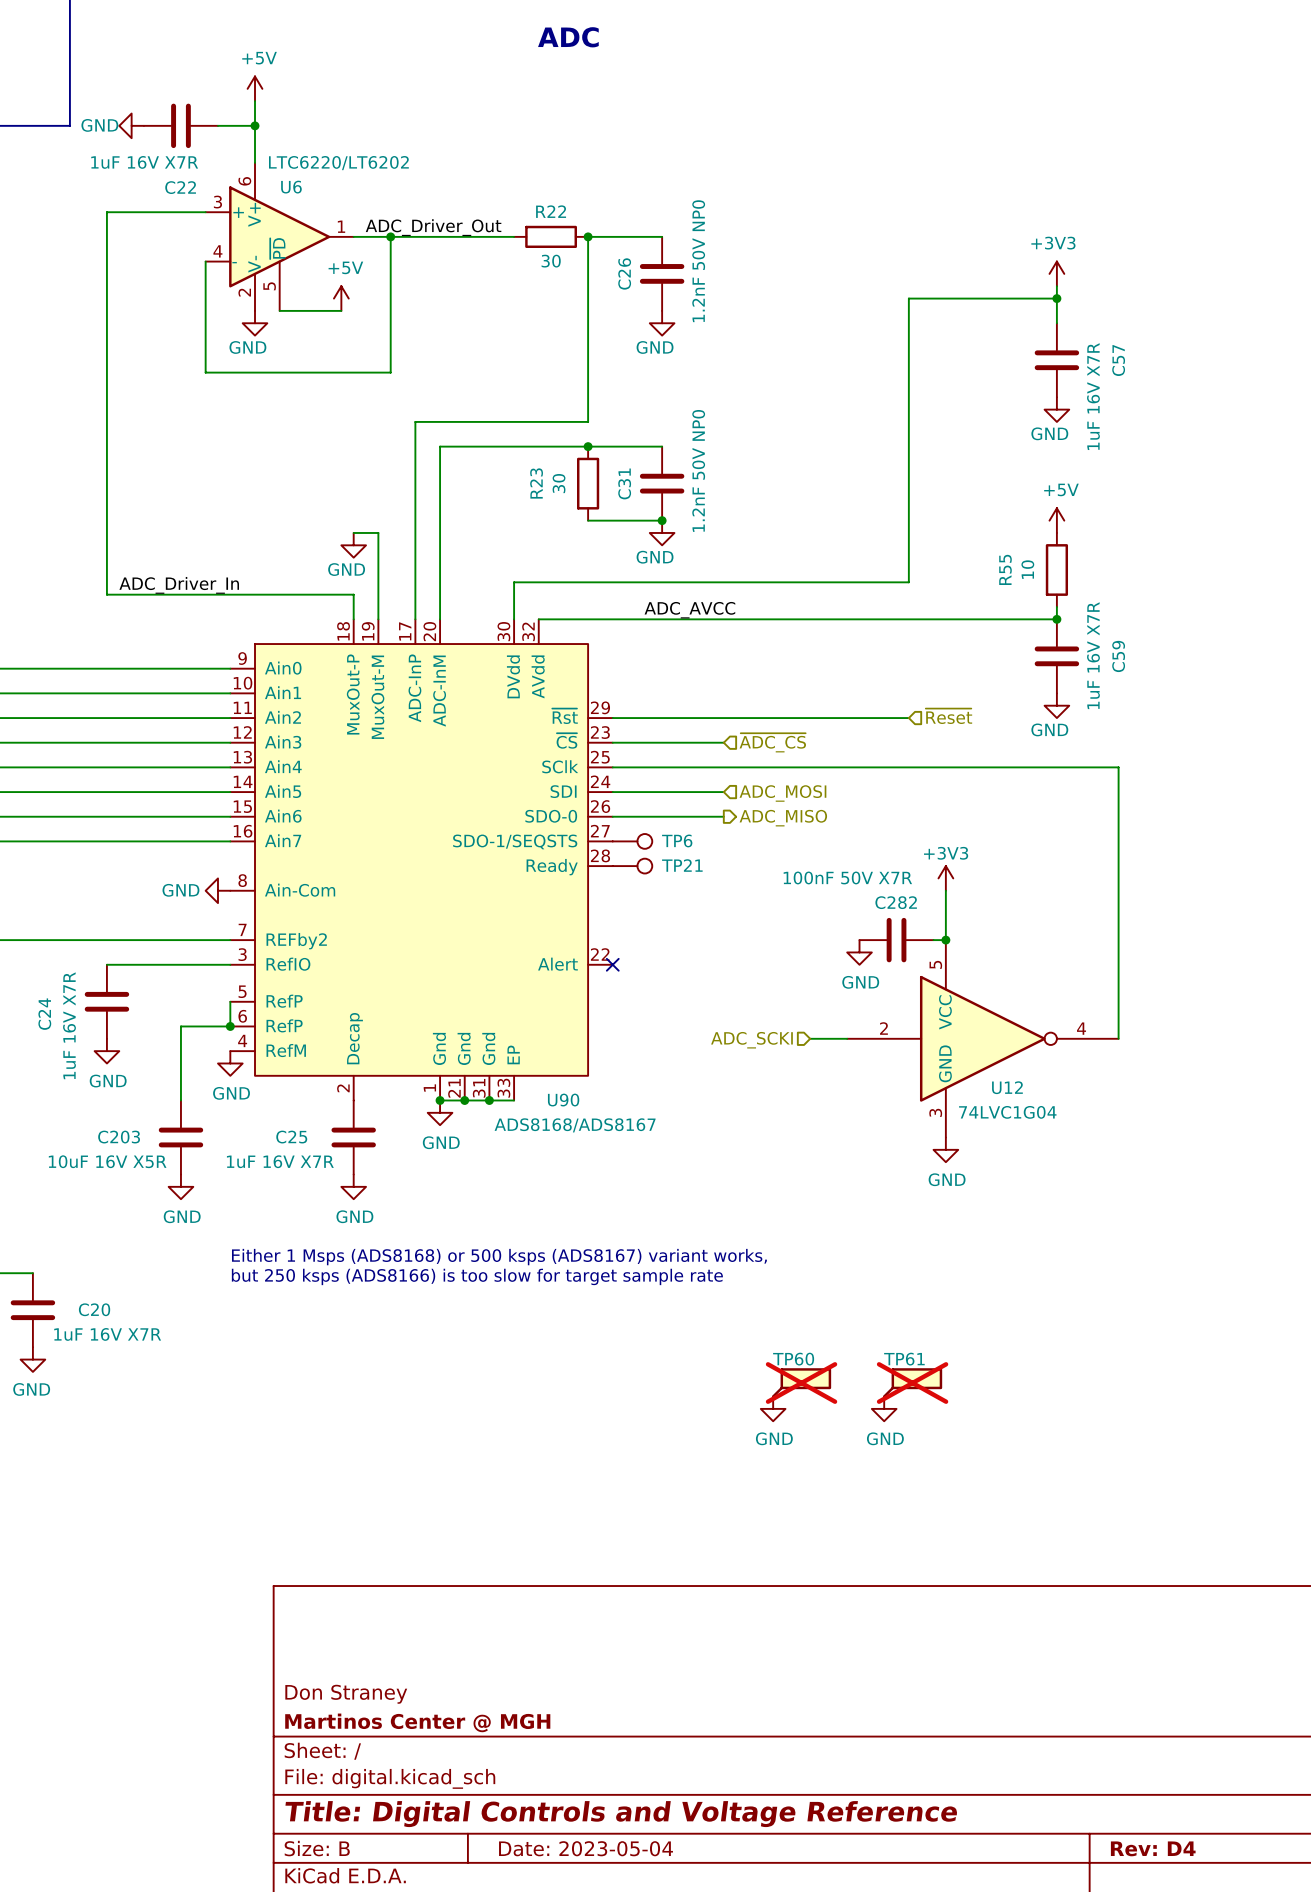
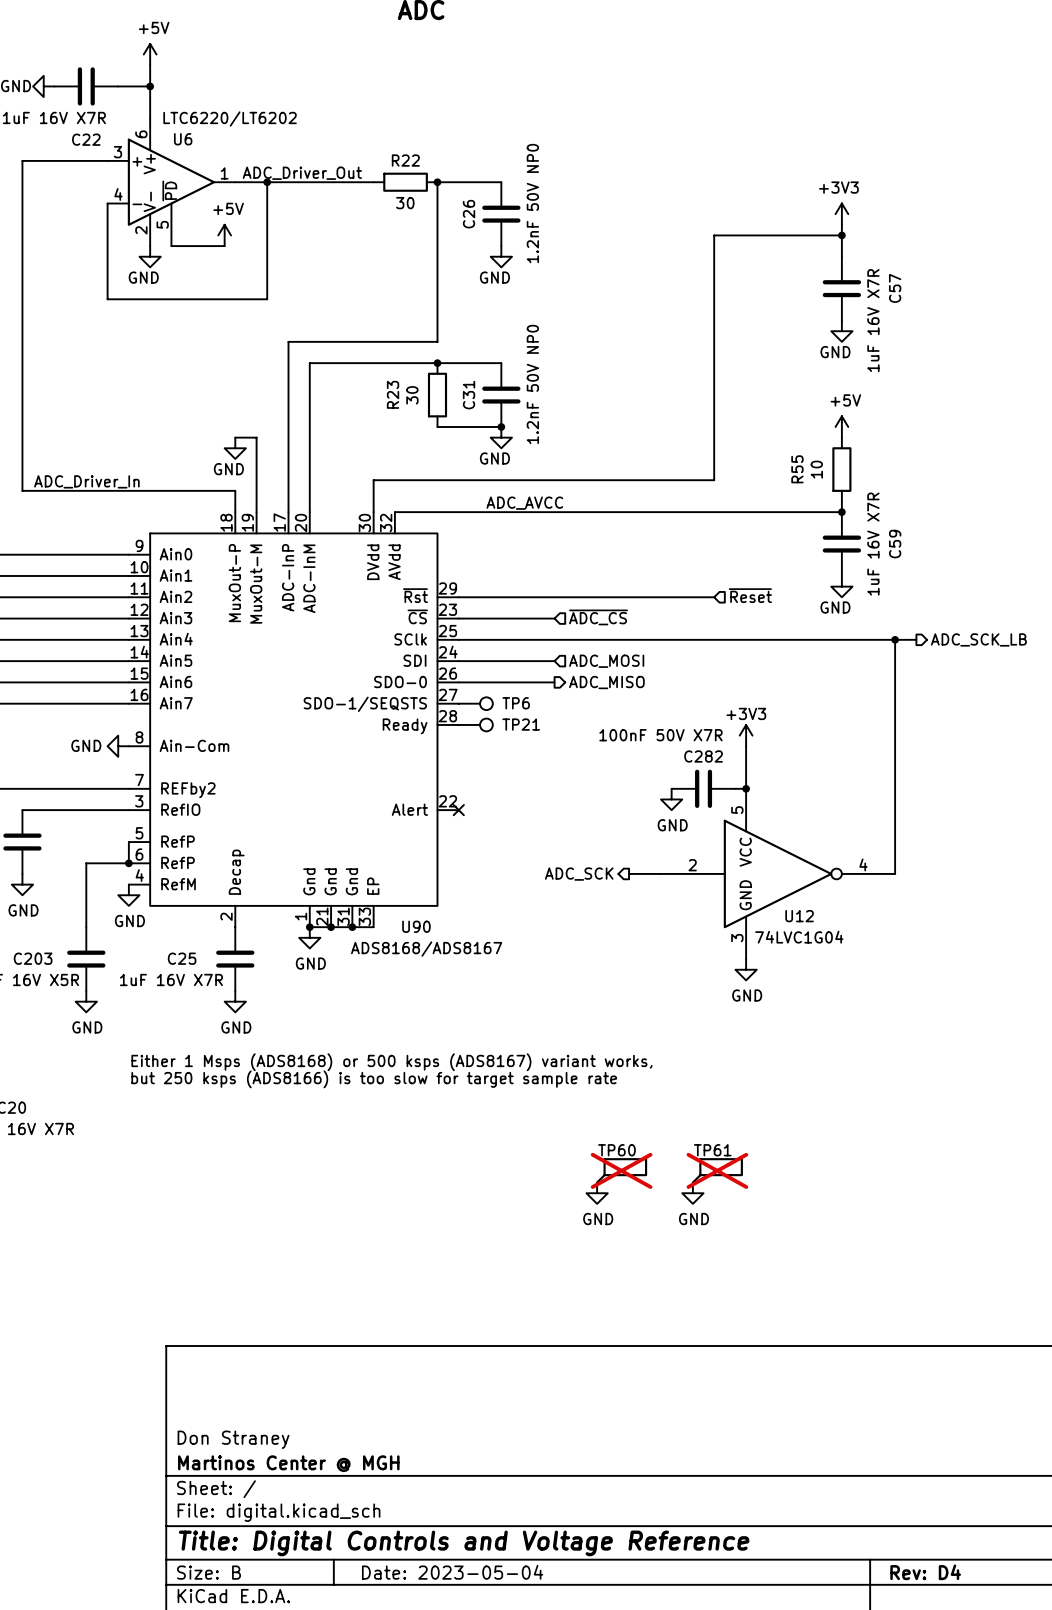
wire: none -> (895, 639) (916, 639)
junction: none -> (895, 639)
hierarchical label: none -> ADC_SCK_LB (978, 639)
hierarchical label shape: input (751, 1040) -> output (579, 874)
hierarchical label: ADC_SCKI (751, 1040) -> ADC_SCK (579, 874)

